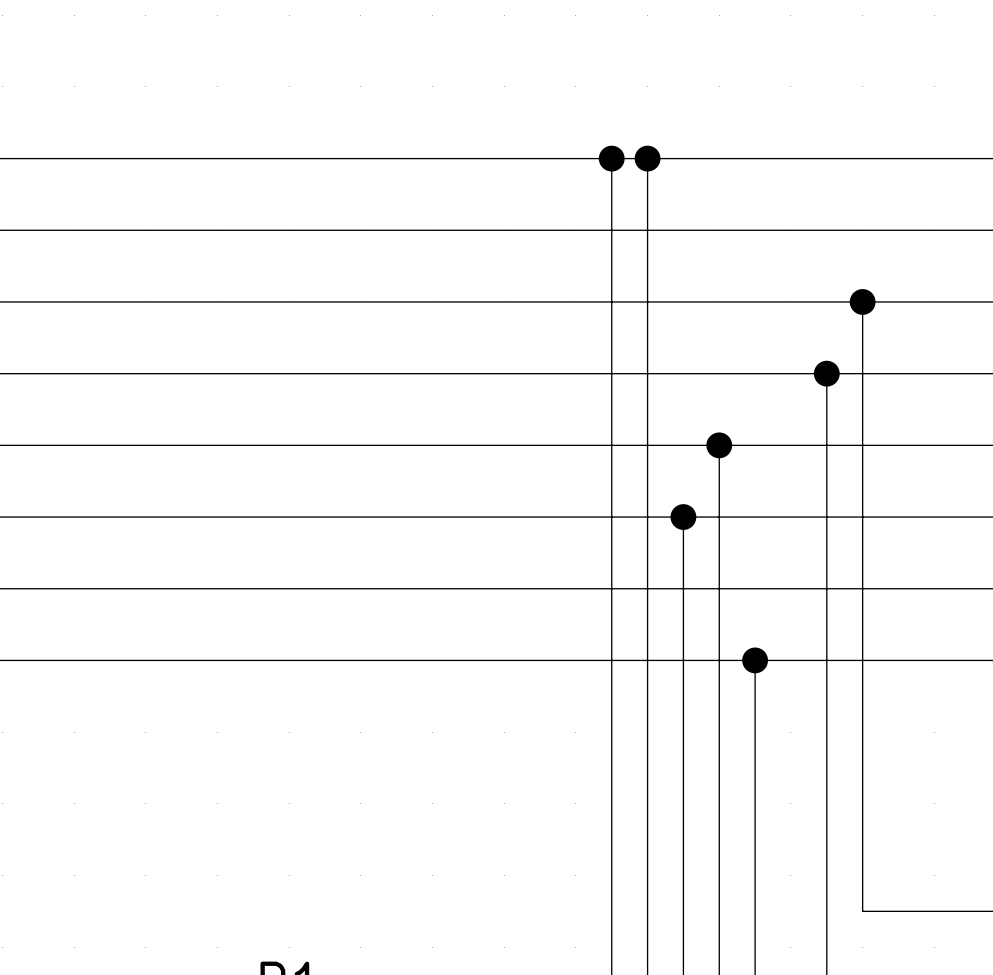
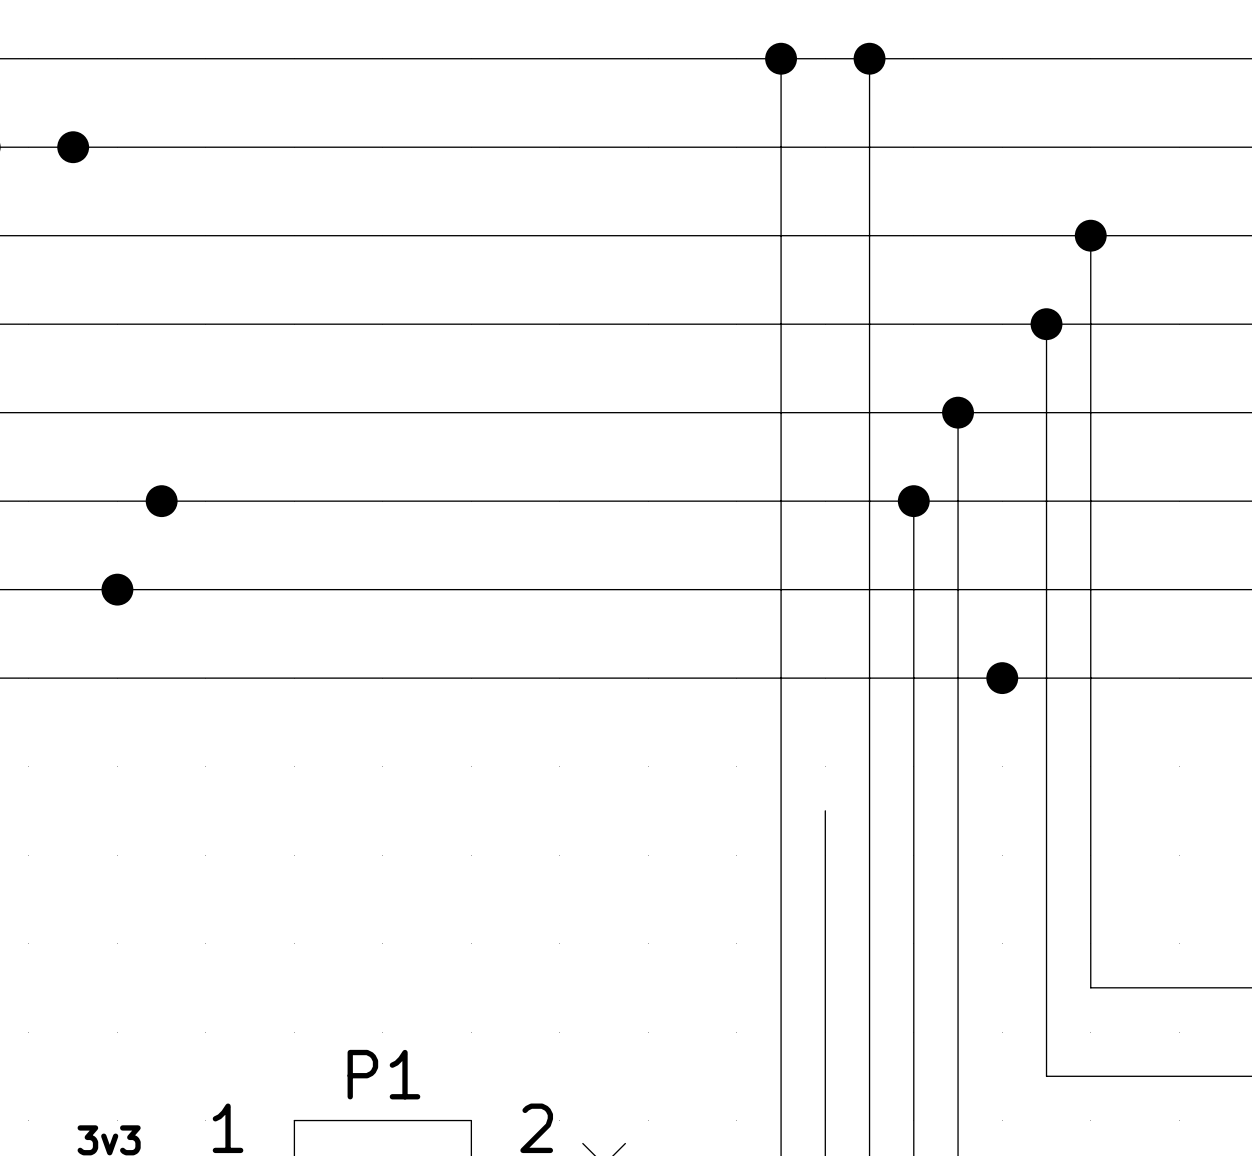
wire: (647, 158) (647, 767) -> none
junction position: (647, 158) -> (869, 58)
wire: none -> (869, 58) (869, 501)
junction: none -> (73, 147)
wire: (719, 445) (719, 517) -> none
junction: (719, 445) -> none
wire: none -> (958, 412) (958, 678)
junction: none -> (958, 412)
junction: none -> (161, 501)
junction: (683, 517) -> none
junction: none -> (913, 501)
junction: none -> (117, 589)
junction position: (755, 660) -> (1002, 678)

